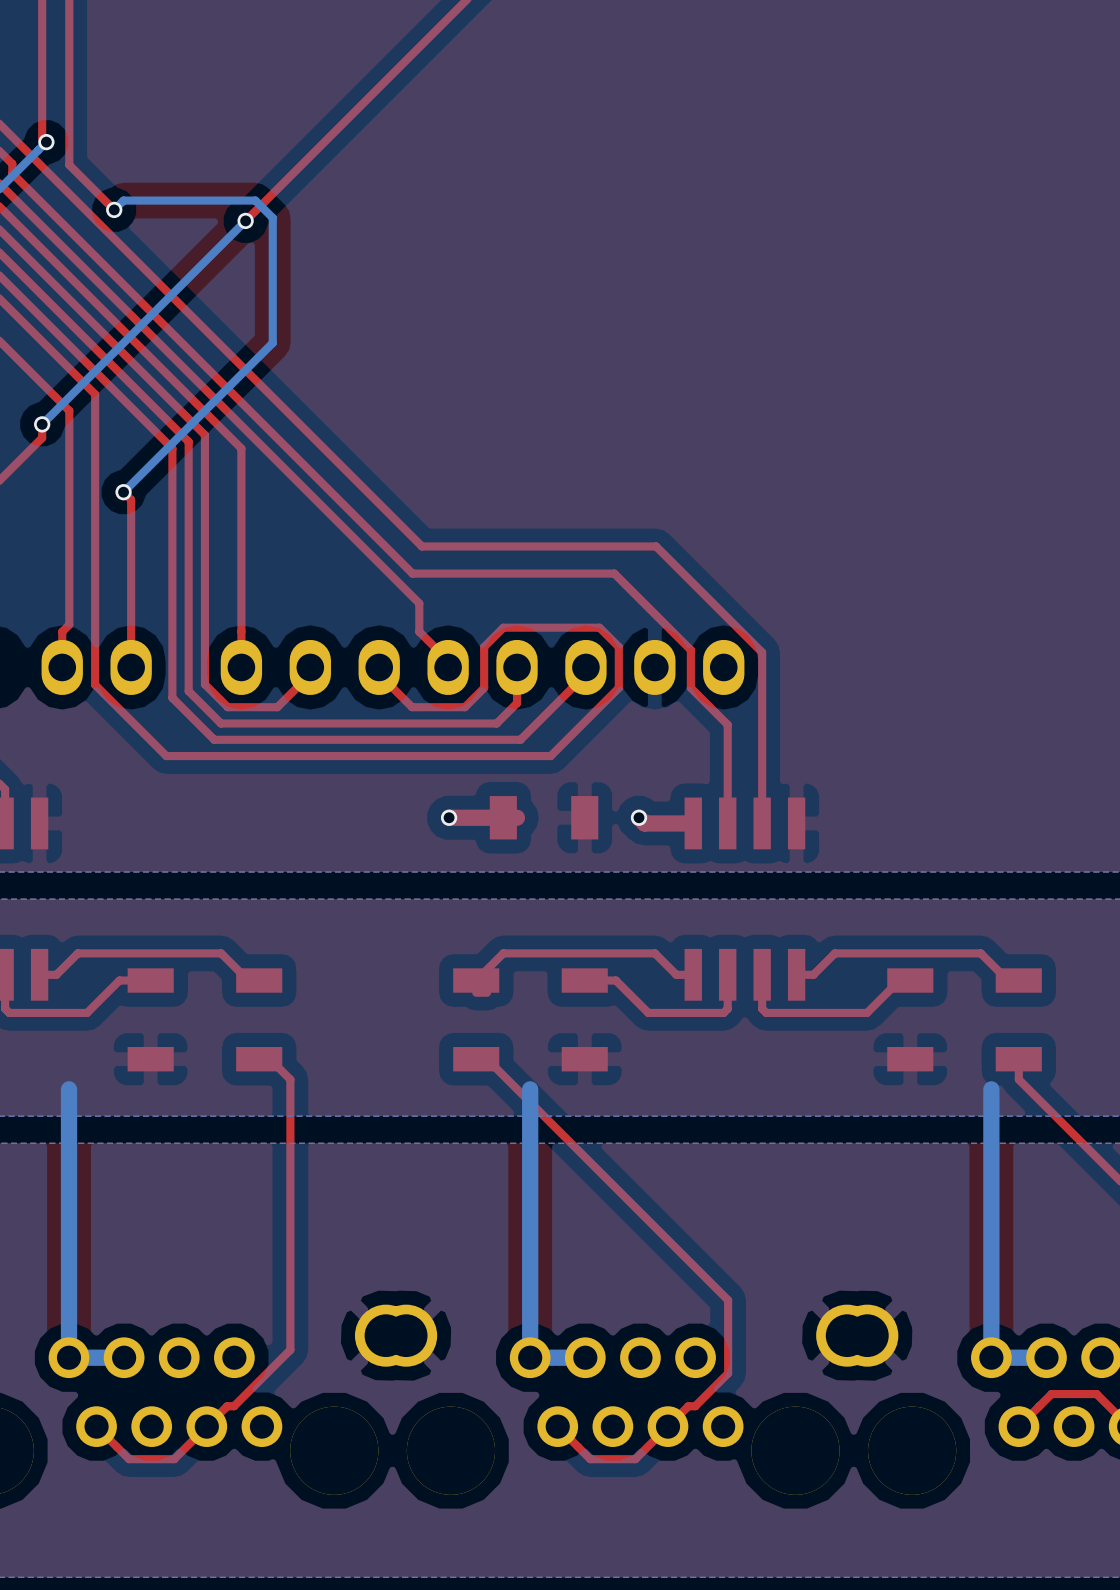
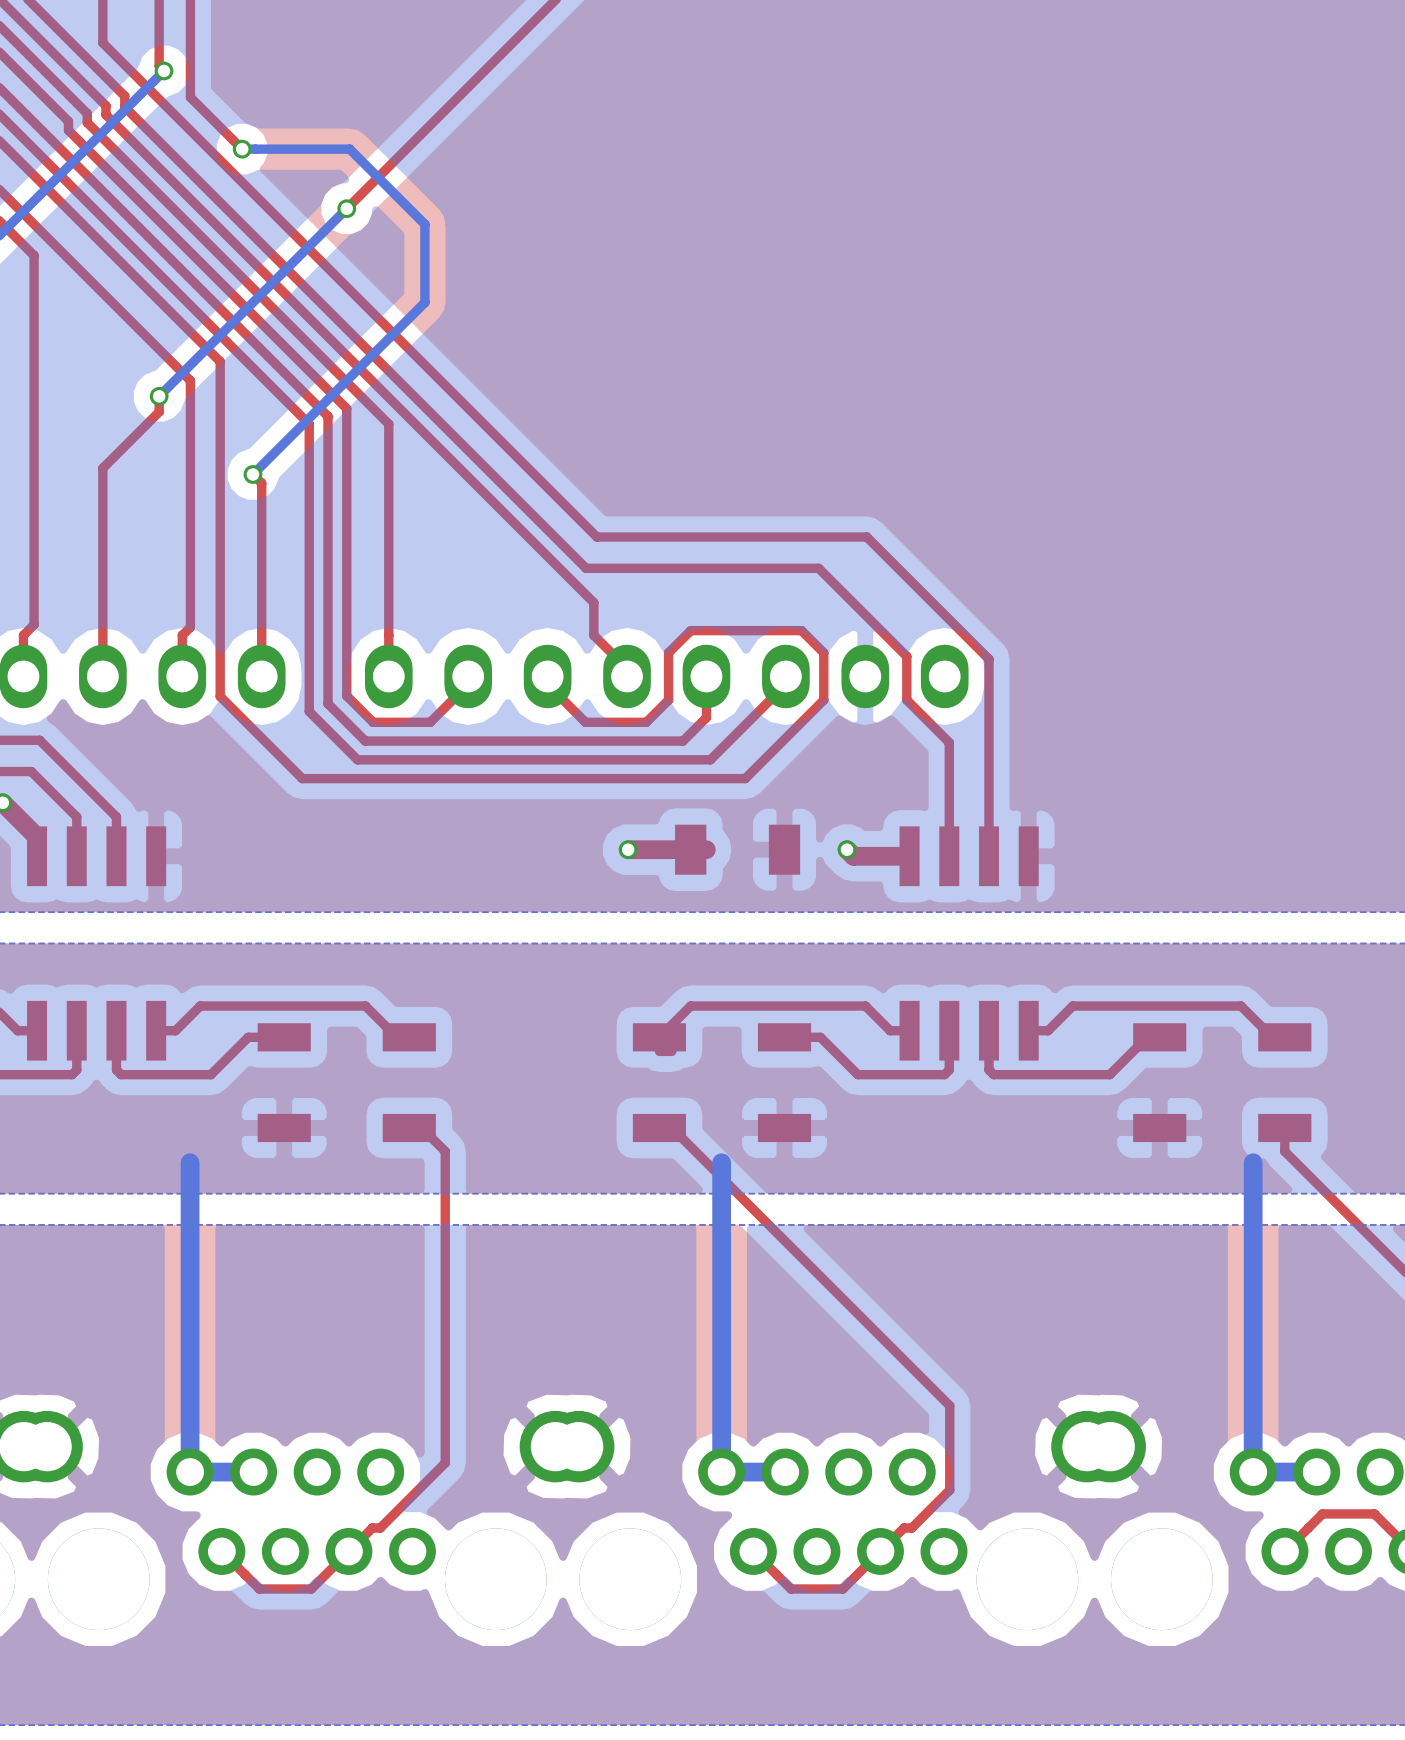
bottom track: (114, 209) (123, 200) (255, 200) (272, 217) (272, 275) -> (242, 149) (349, 149) (424, 224)
top track: none -> (393, 161) (346, 208)
bottom track: (245, 220) (204, 261) -> none
via position: (245, 220) -> (346, 208)

